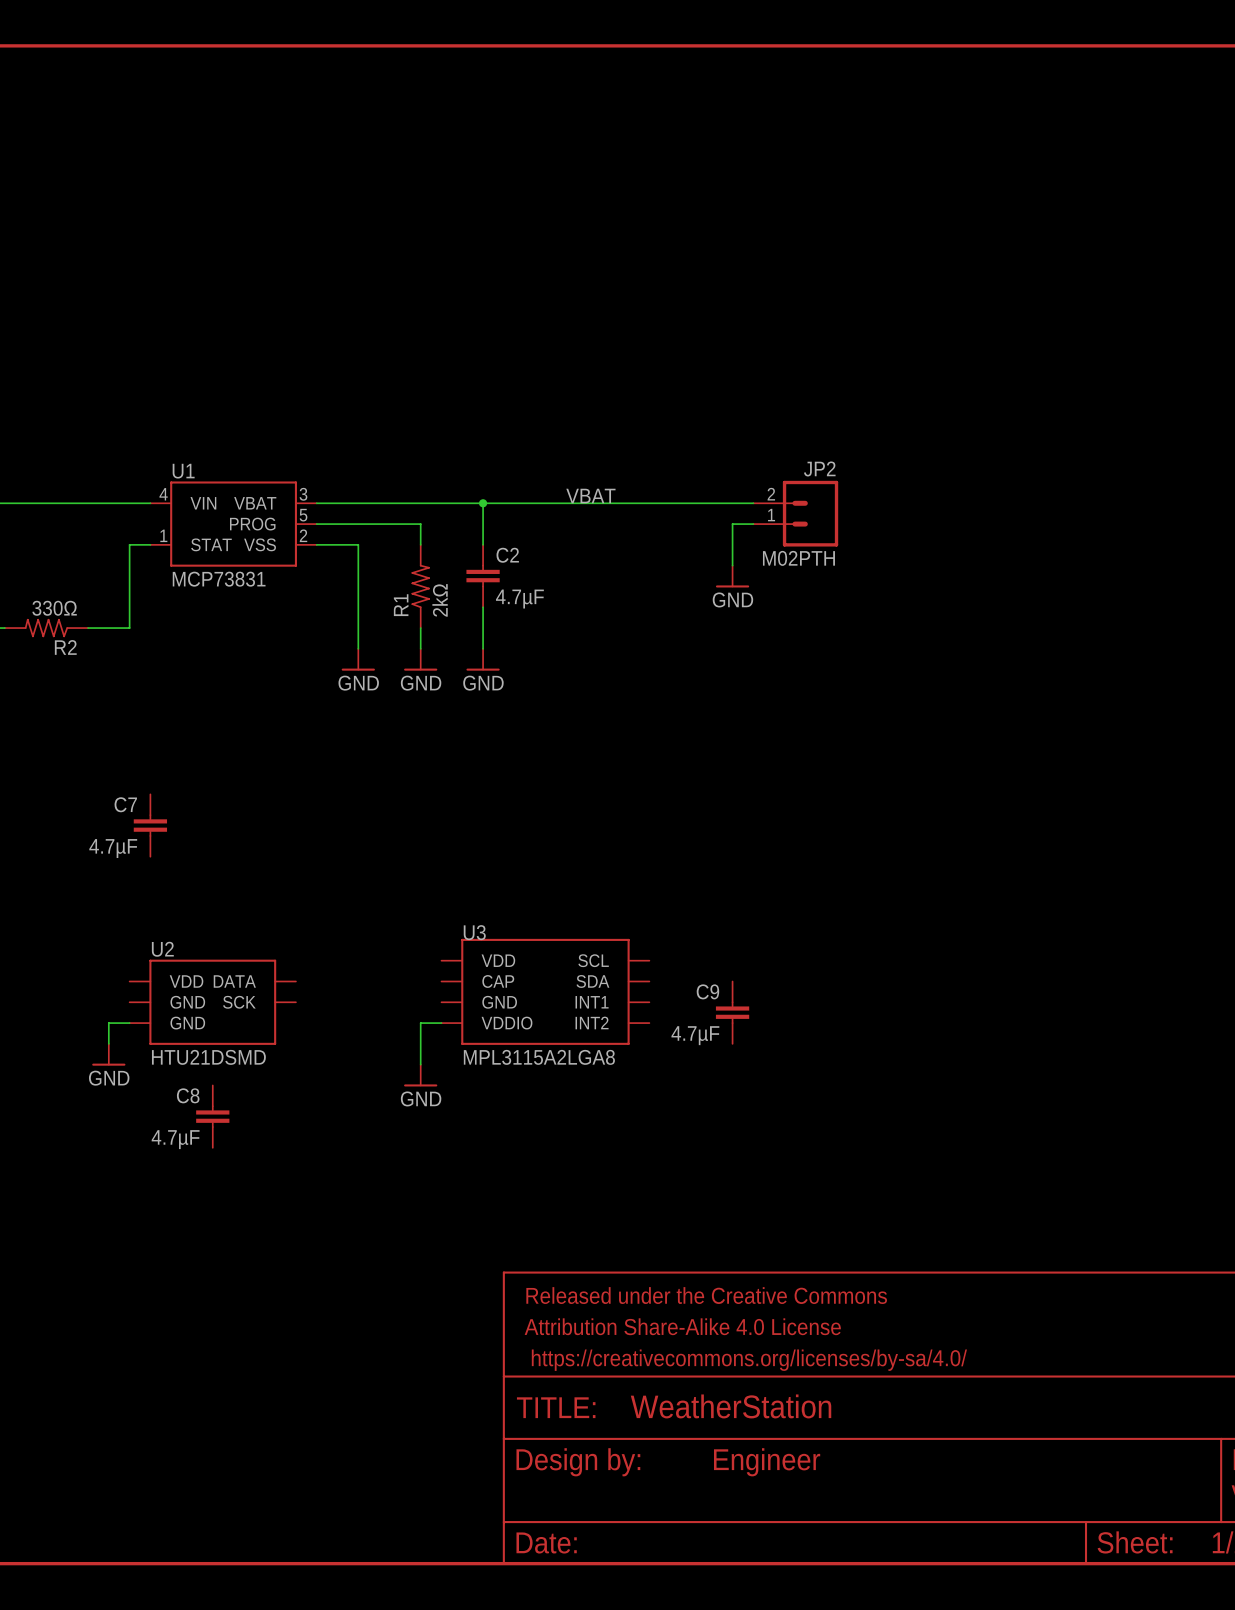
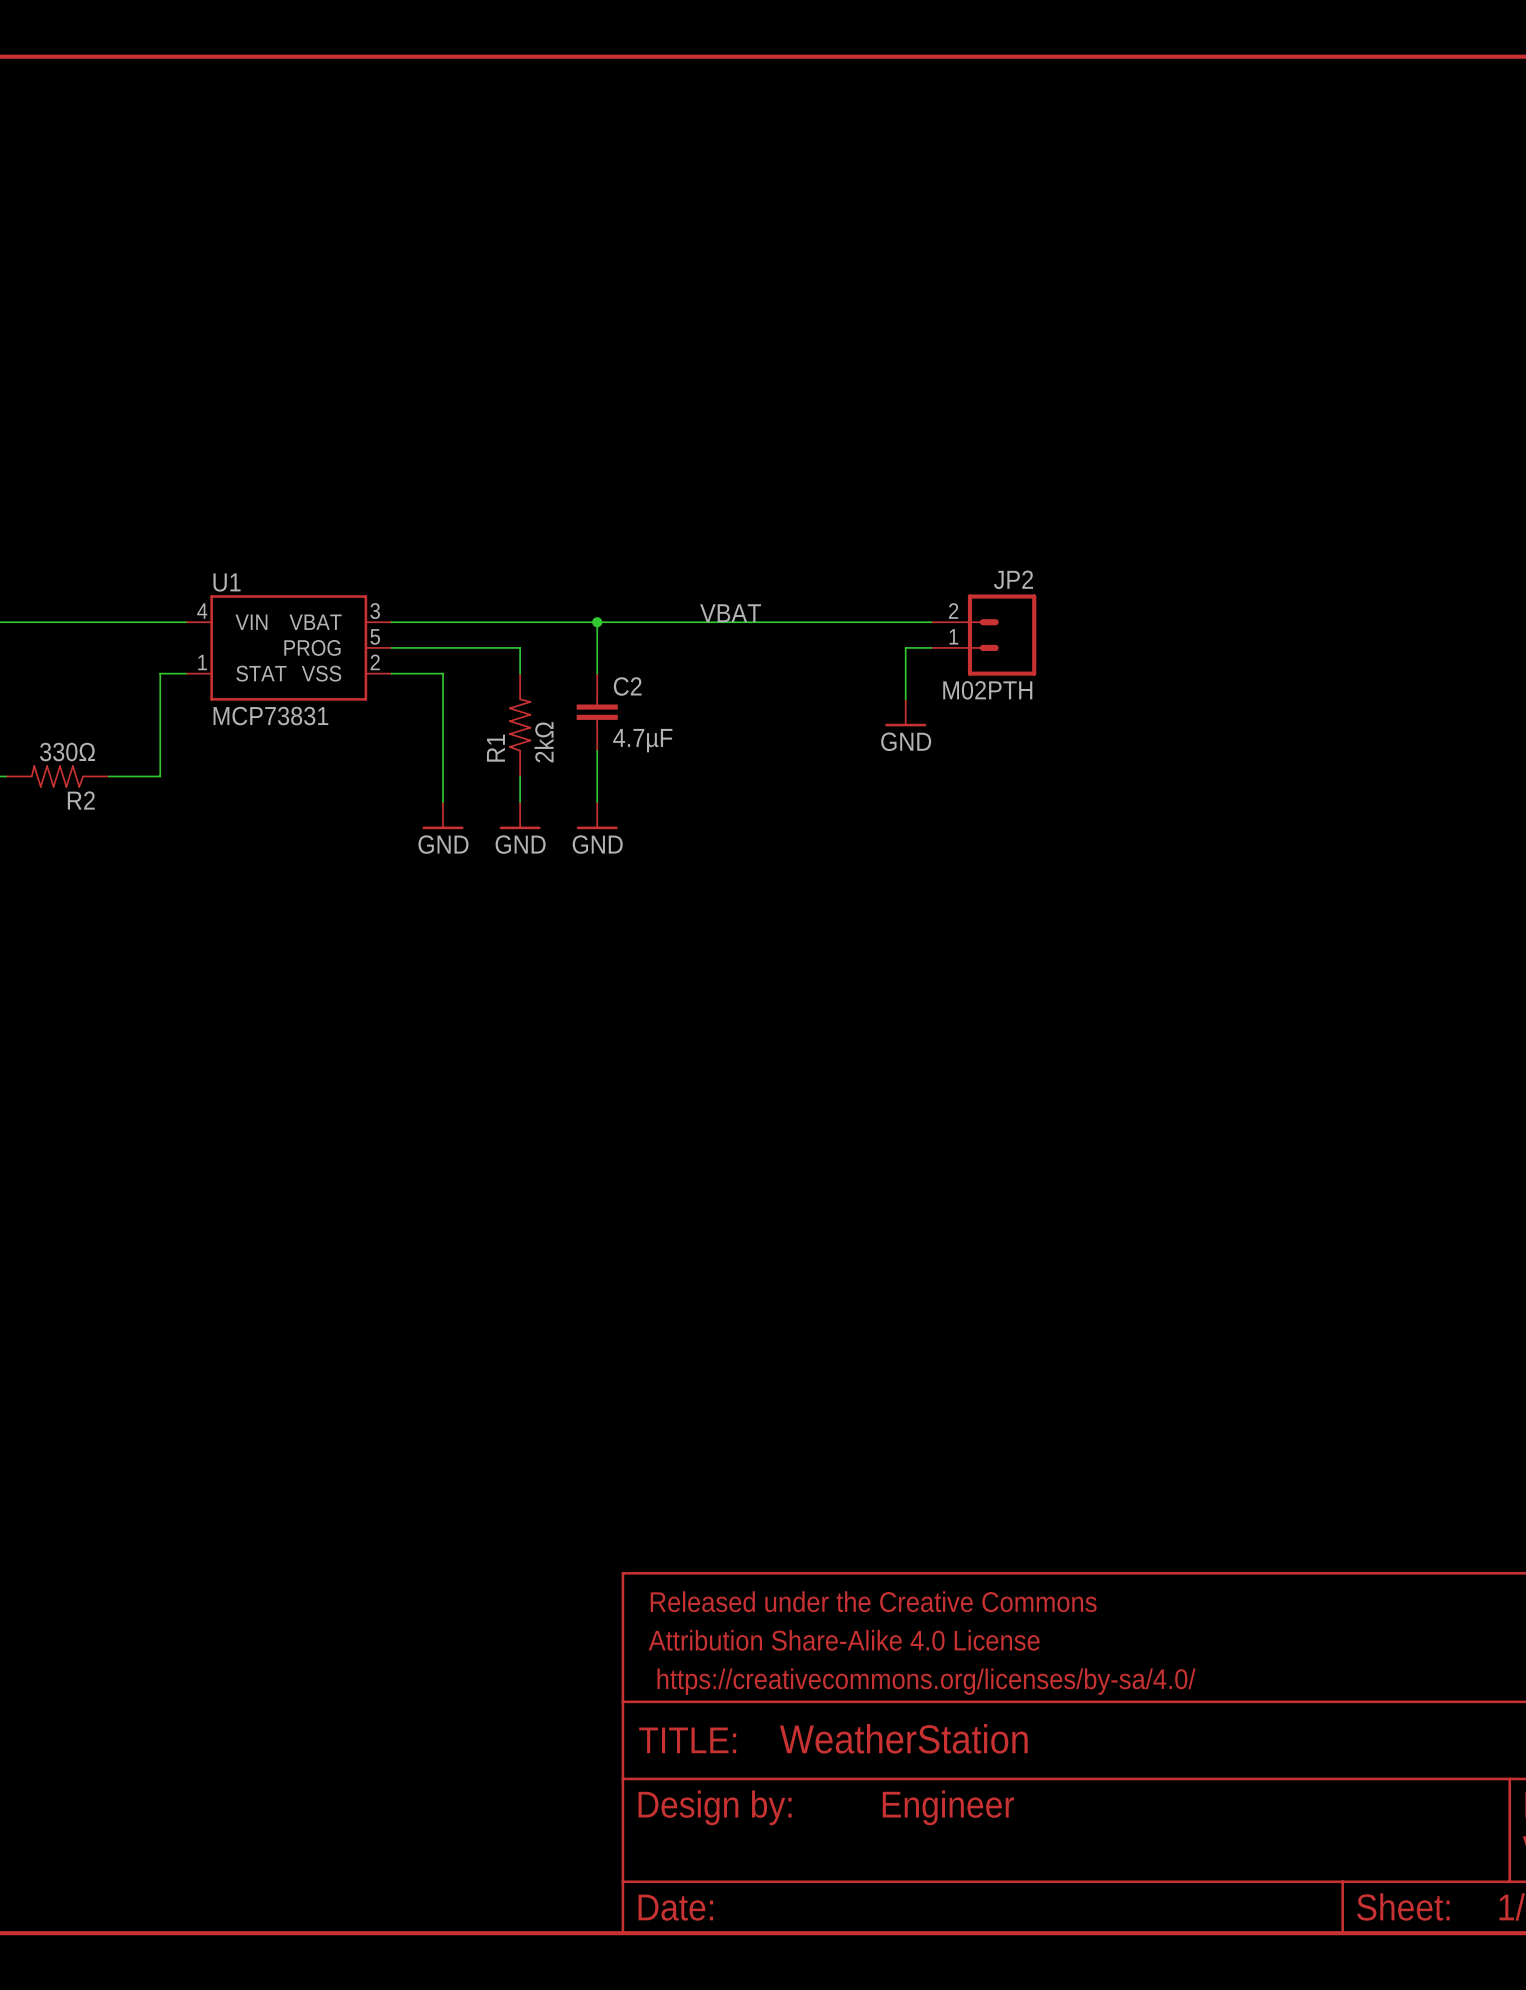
C7: 4.7µF (150, 825) -> none
U3: MPL3115A2LGA8 (545, 991) -> none
U2: HTU21DSMD (212, 1002) -> none
C9: 4.7µF (732, 1012) -> none
wire: (129, 1023) (108, 1023) (108, 1043) -> none
wire: (441, 1023) (420, 1023) (420, 1064) -> none
power symbol: GND (108, 1054) -> none
power symbol: GND (420, 1075) -> none
C8: 4.7µF (212, 1116) -> none

